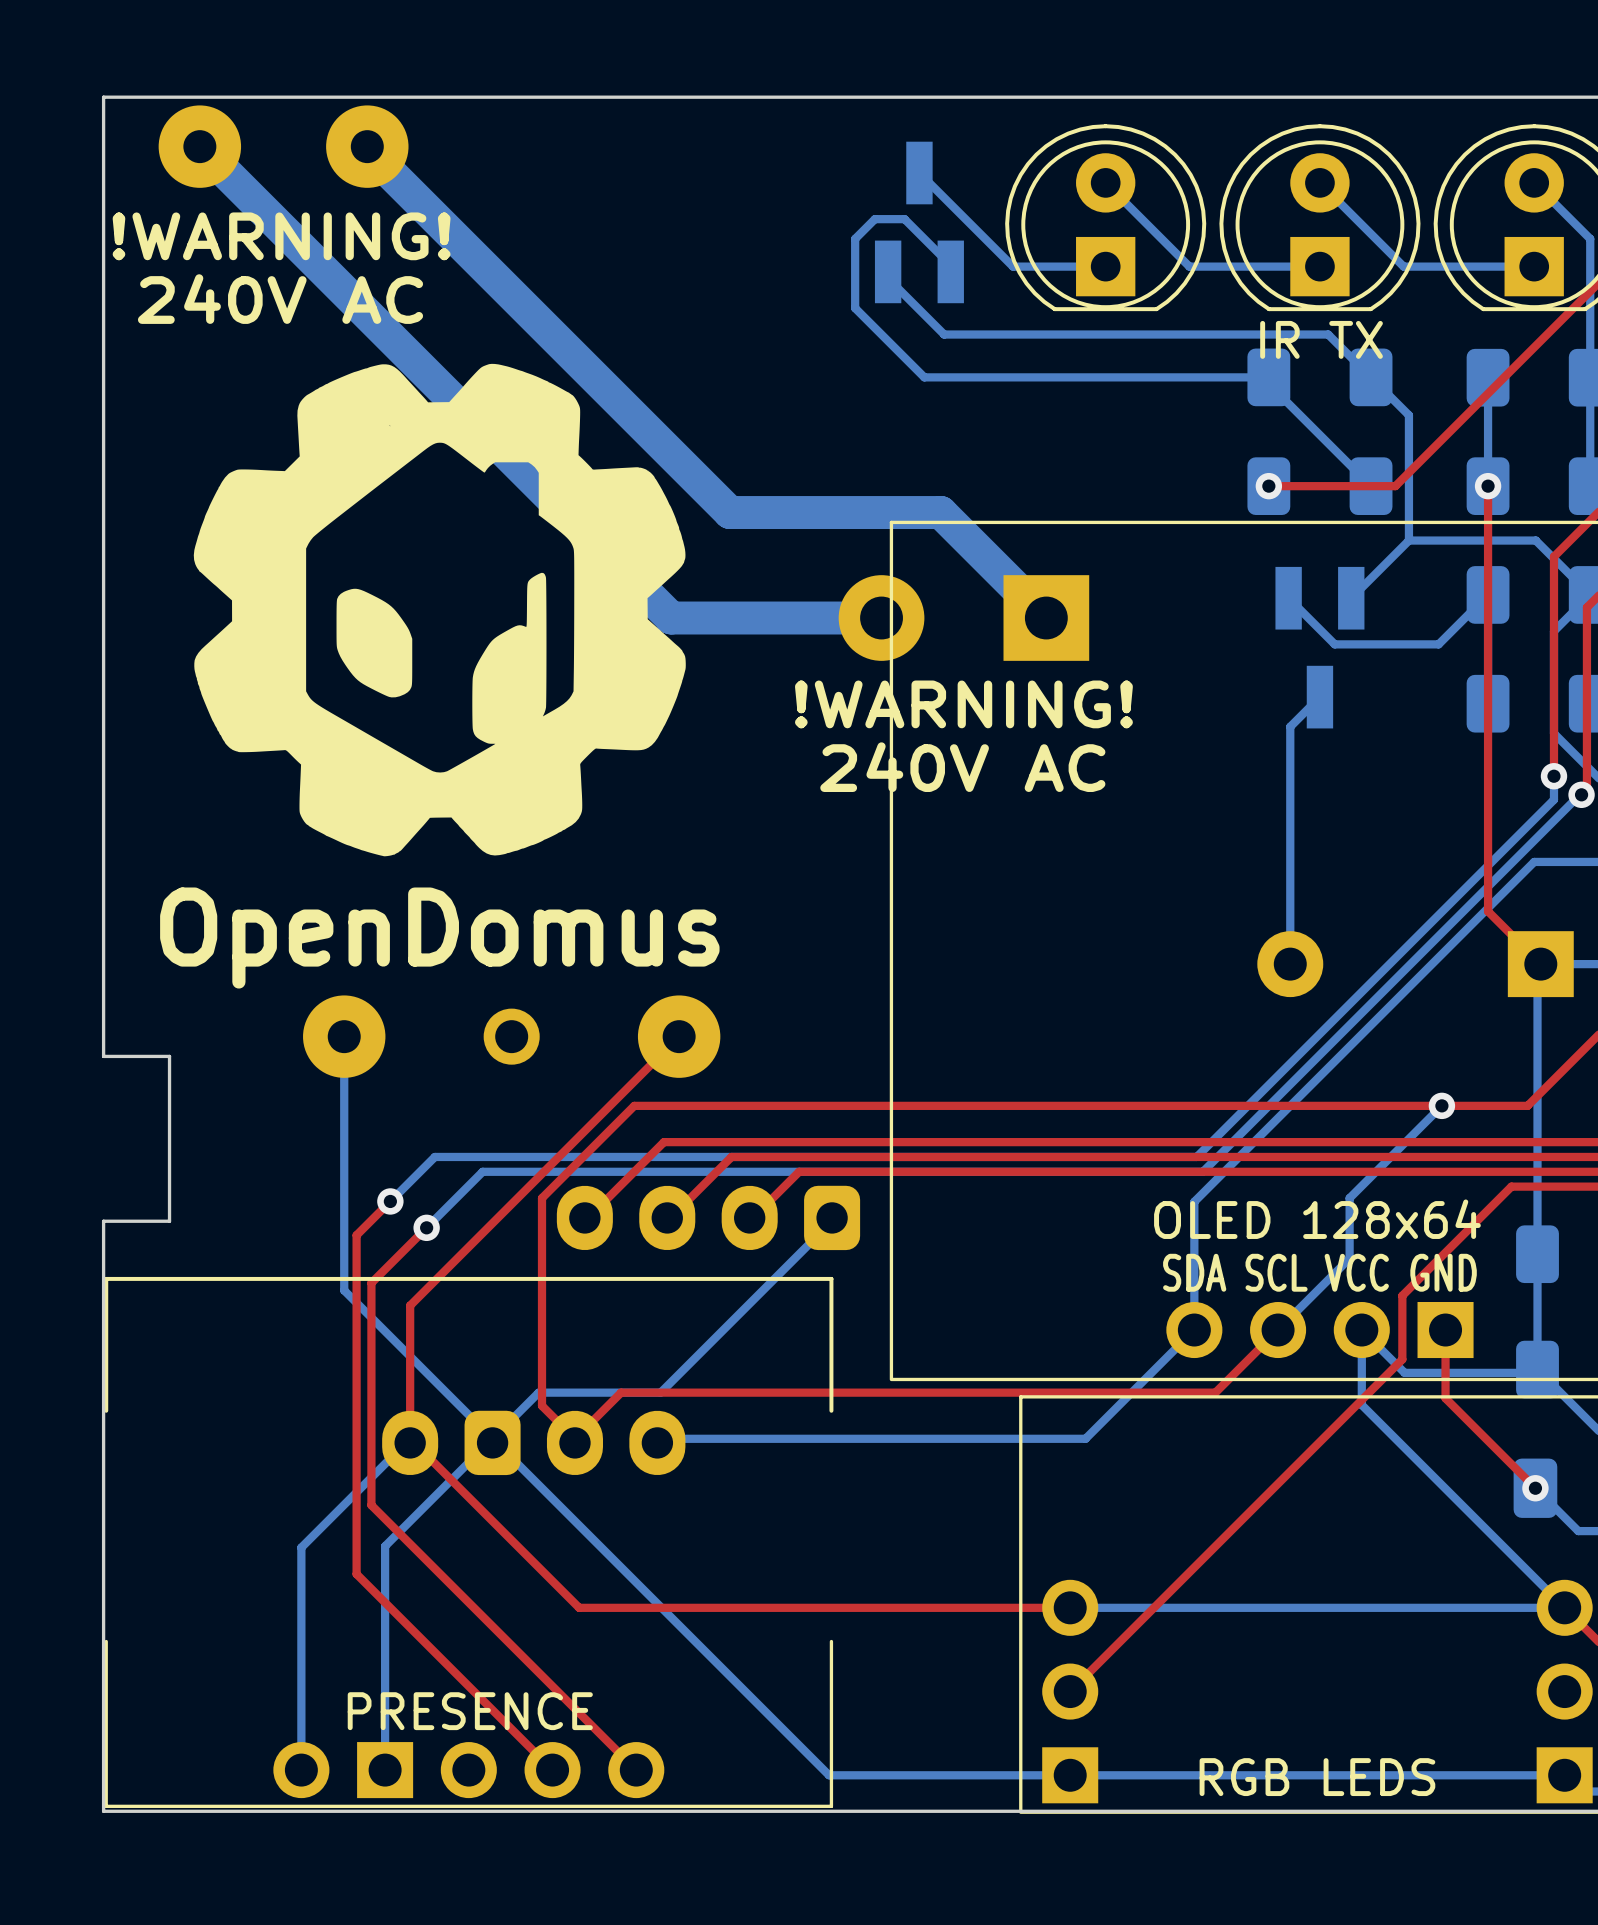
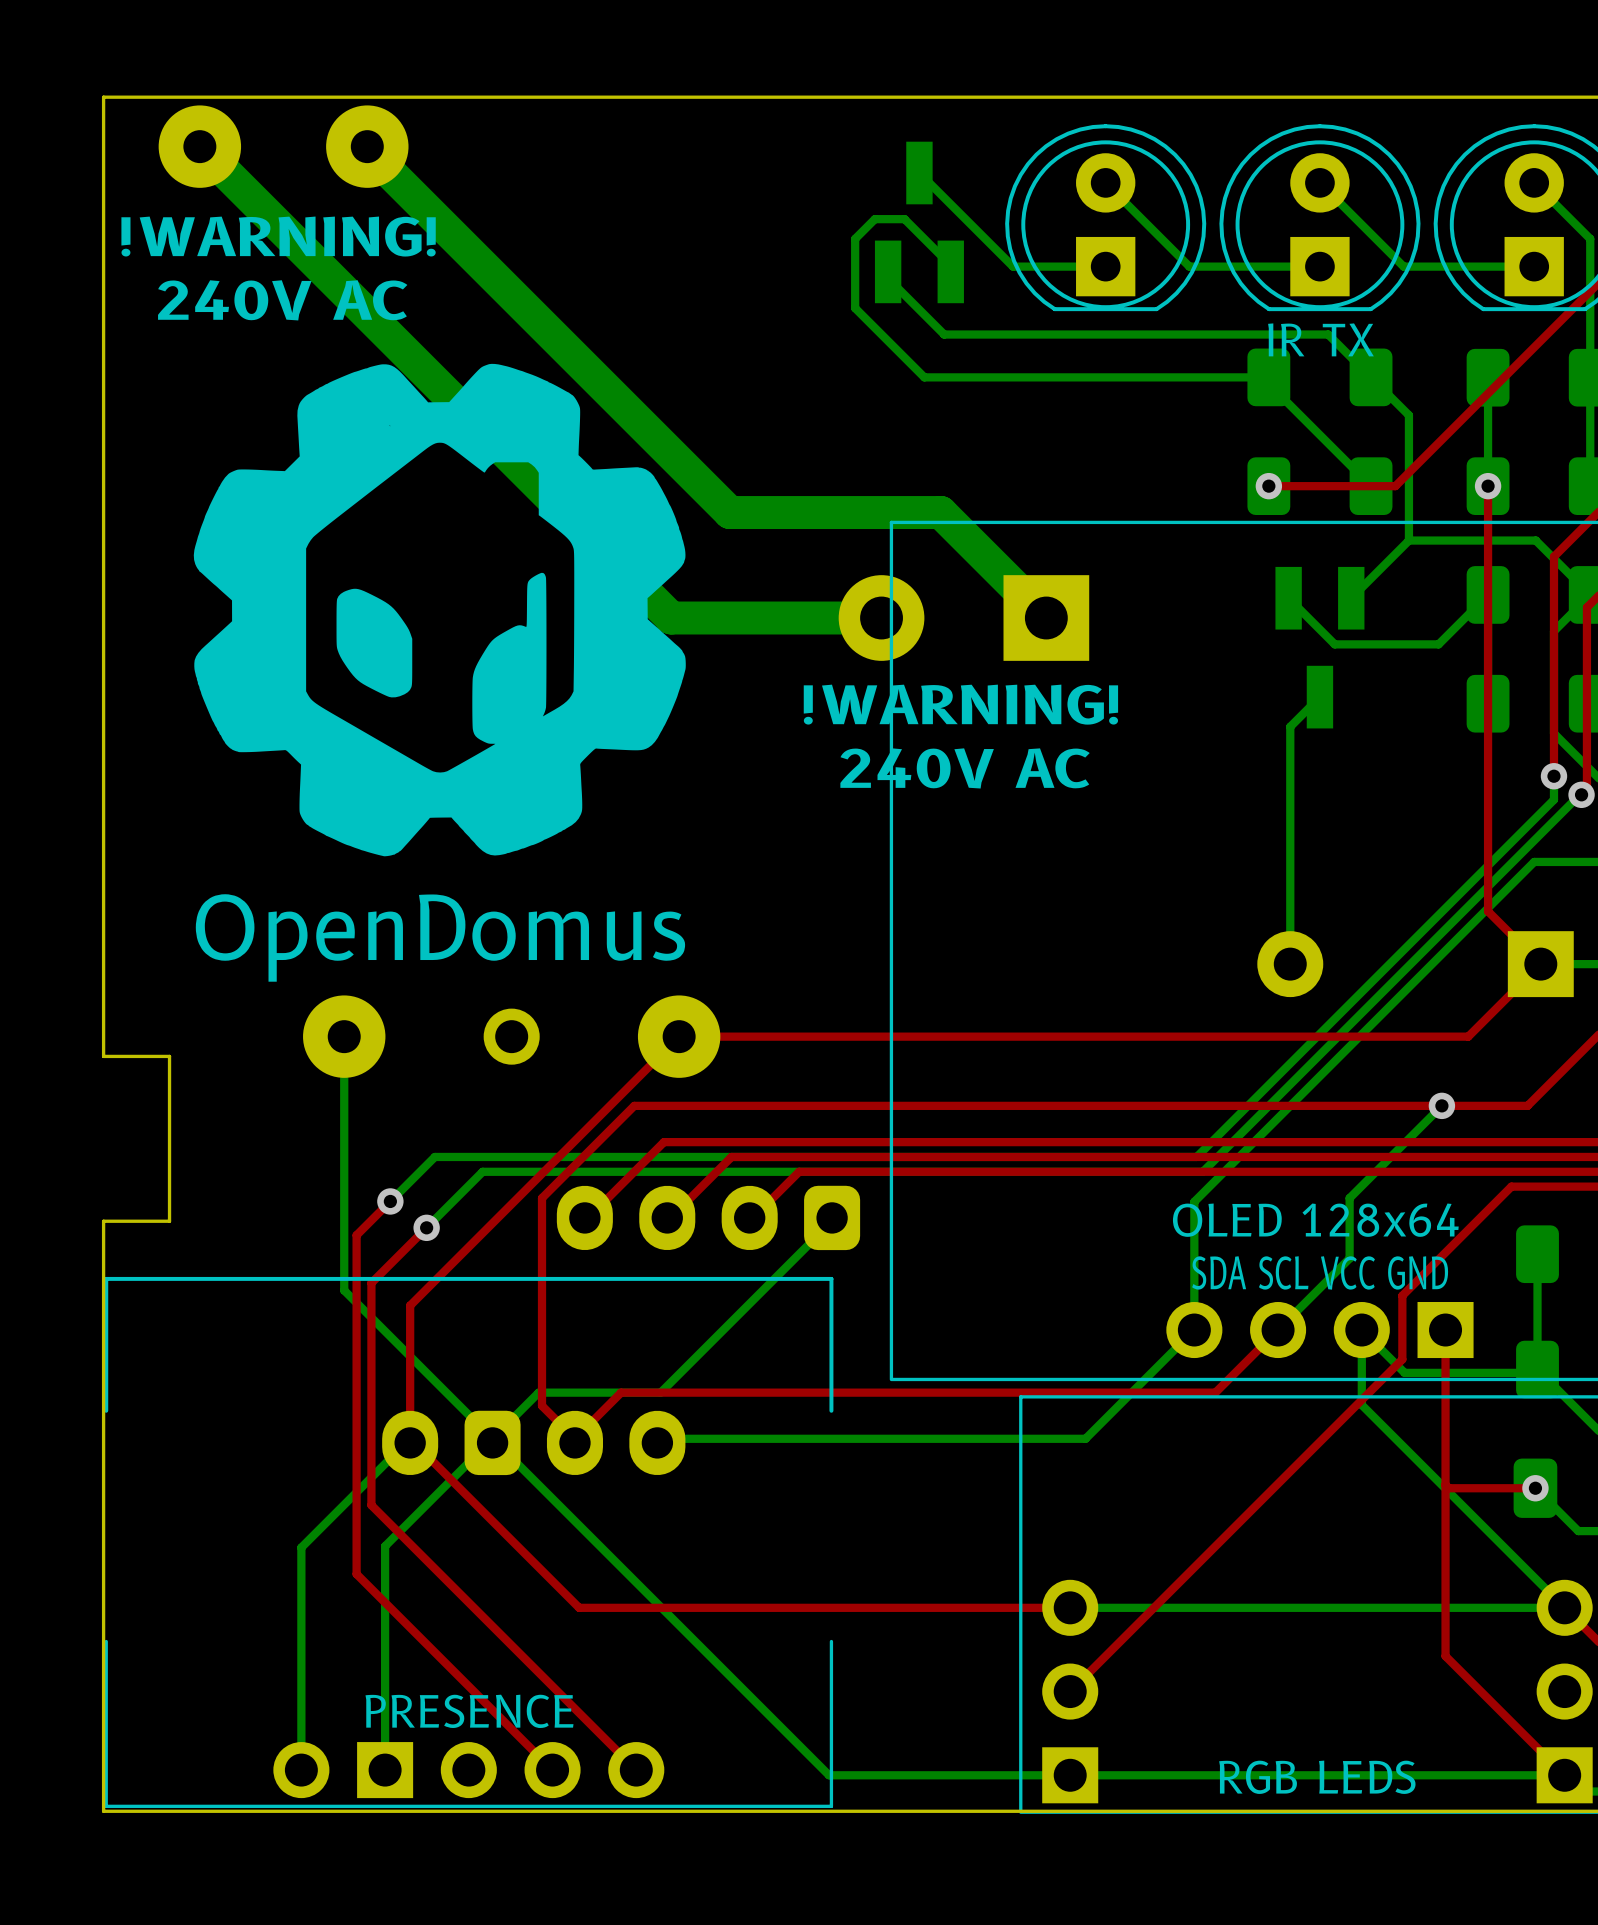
top track: none -> (1540, 964) (1468, 1036) (679, 1036)
bottom track: (1537, 967) (1537, 1254) -> none
top track: (1445, 1398) (1535, 1488) -> (1445, 1484) (1448, 1488) (1535, 1488)
top track: none -> (1445, 1398) (1445, 1656) (1564, 1775)

